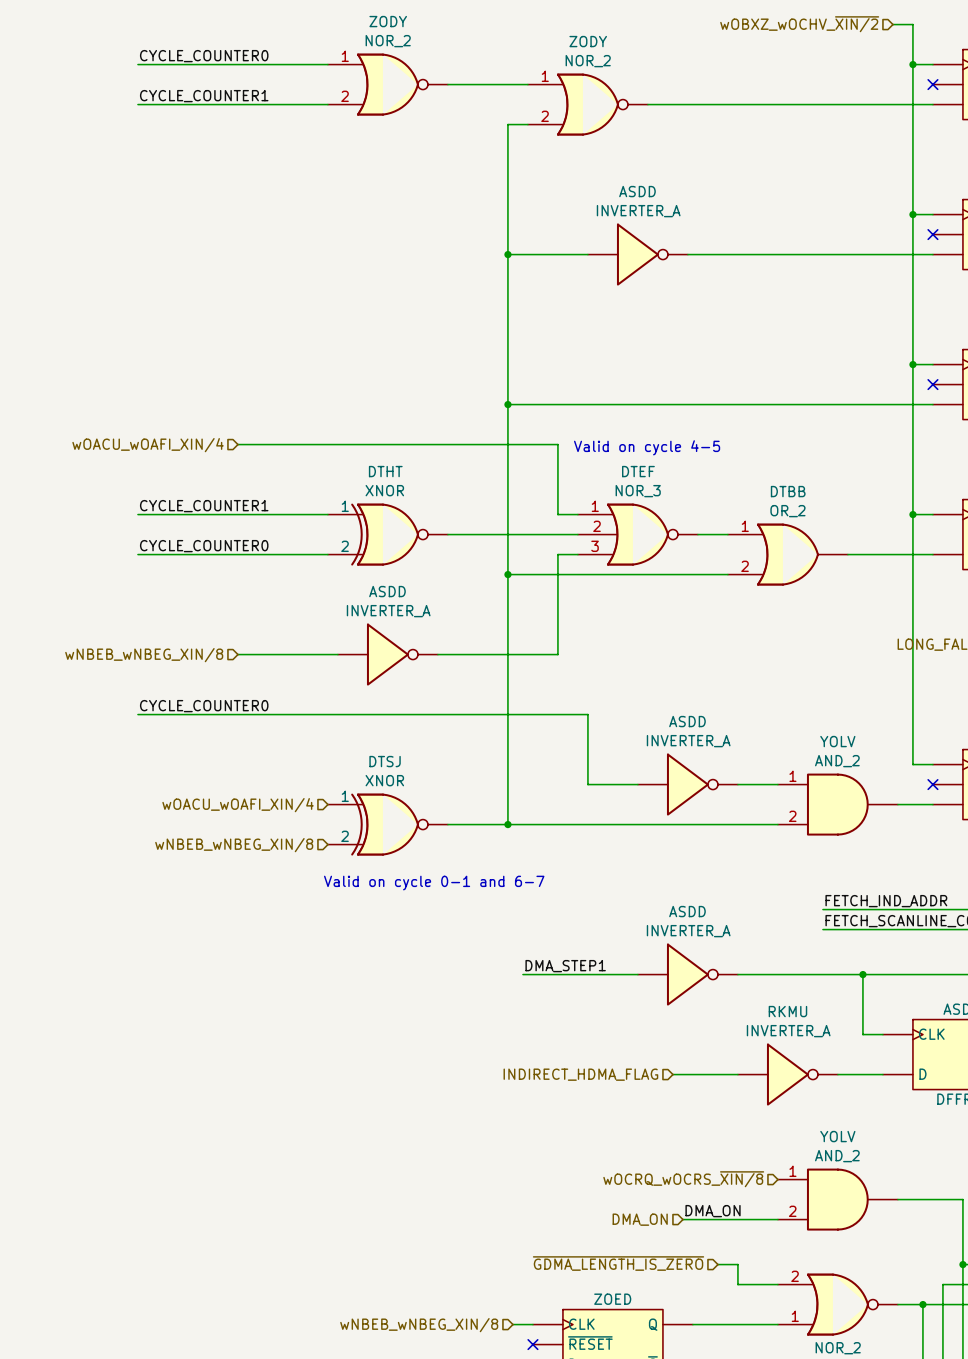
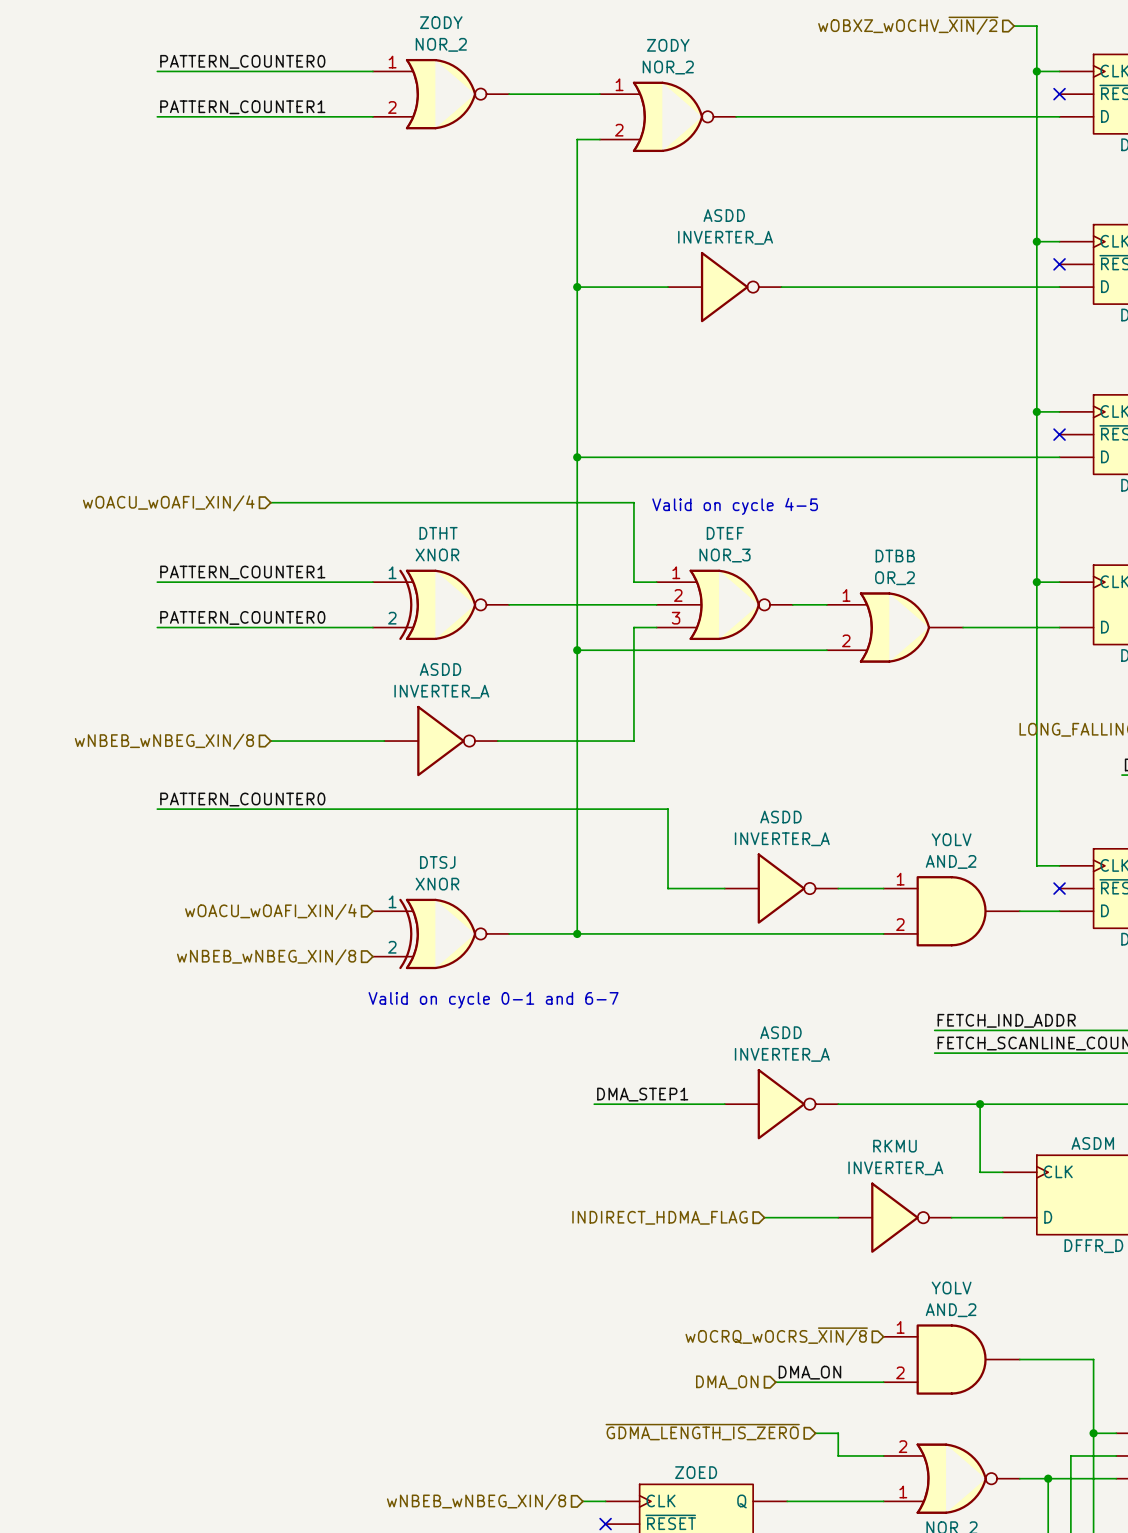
label: CYCLE_COUNTER0 (204, 56) -> PATTERN_COUNTER0 (242, 61)
label: CYCLE_COUNTER1 (204, 96) -> PATTERN_COUNTER1 (242, 107)
label: CYCLE_COUNTER1 (204, 506) -> PATTERN_COUNTER1 (242, 572)
label: CYCLE_COUNTER0 (204, 546) -> PATTERN_COUNTER0 (242, 617)
label: CYCLE_COUNTER0 (204, 706) -> PATTERN_COUNTER0 (242, 799)

